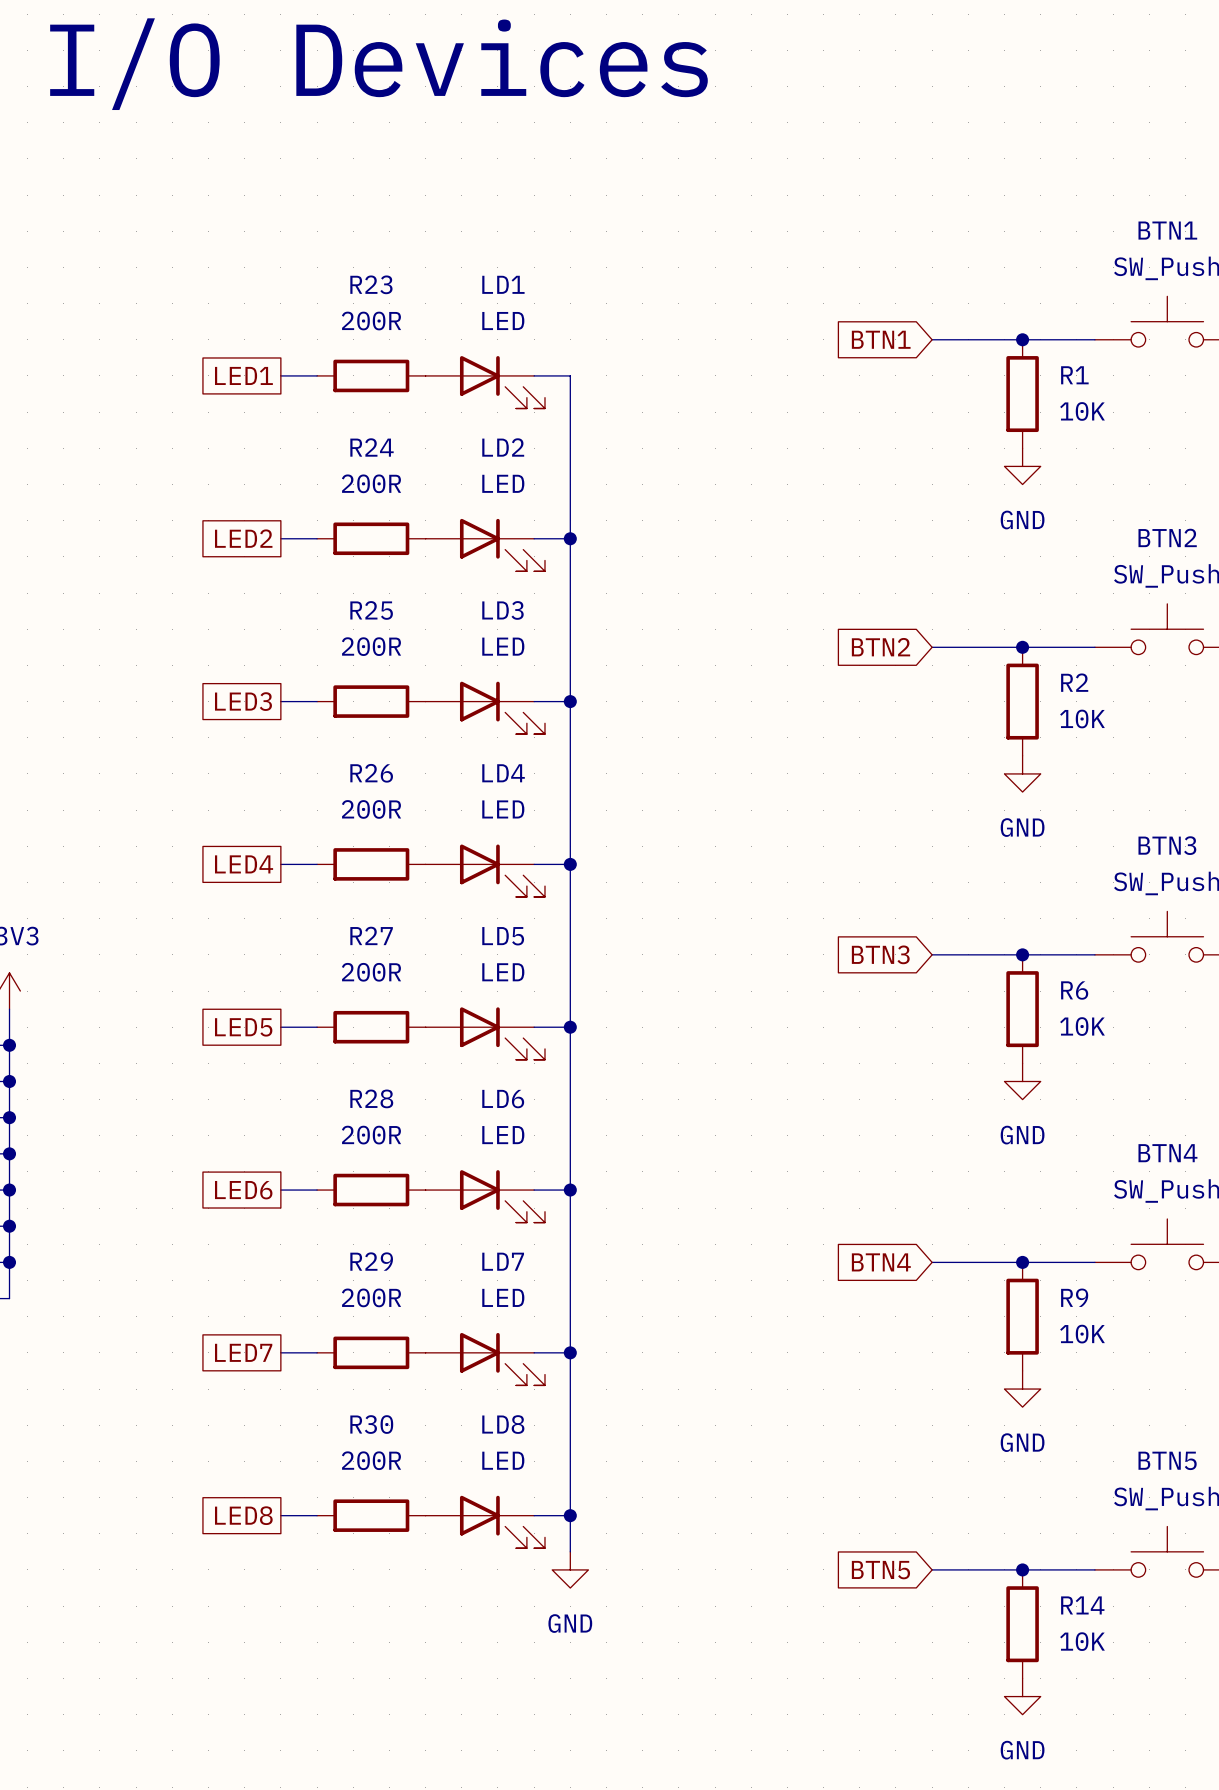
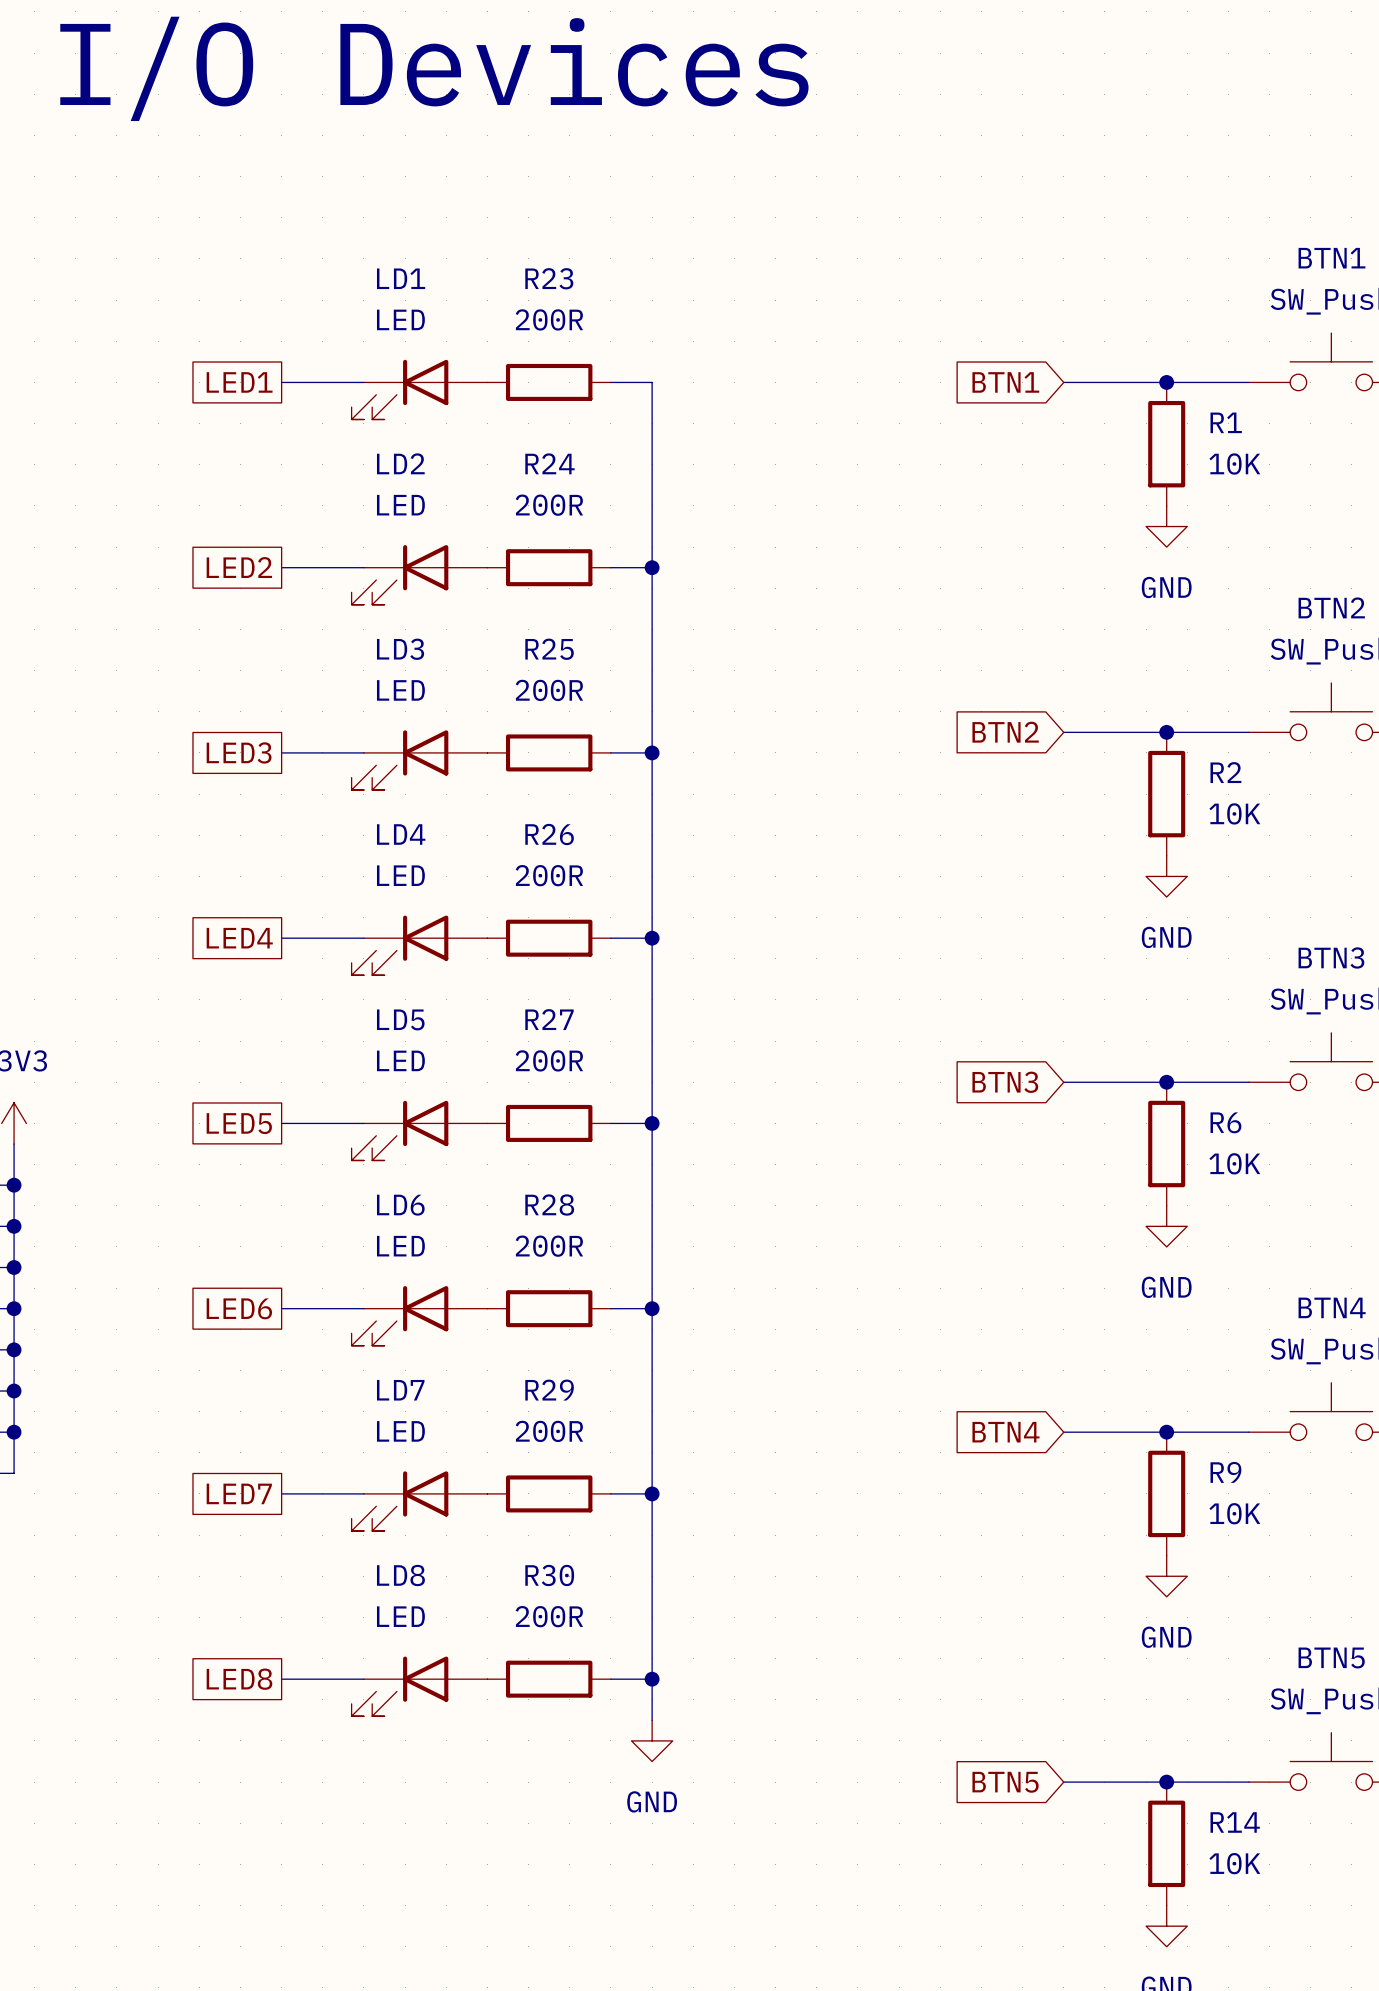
wire: none -> (281, 382) (363, 382)
global label position: LED1 (243, 375) -> LED1 (239, 382)
wire: (280, 375) (317, 375) -> none
R23 position: (371, 375) -> (549, 382)
wire: (534, 375) (570, 375) -> (610, 382) (652, 382) (652, 423)
LD1 position: (485, 382) -> (419, 389)
LD1 flip: as is (502, 382) -> left-right (399, 389)
wire: none -> (281, 567) (363, 567)
global label position: LED2 (243, 538) -> LED2 (239, 567)
wire: (280, 538) (317, 538) -> (610, 567) (652, 567)
R24 position: (371, 538) -> (549, 567)
wire: (534, 538) (570, 538) -> (610, 752) (652, 752)
junction position: (570, 538) -> (652, 567)
LD2 position: (485, 545) -> (419, 574)
LD2 flip: as is (502, 545) -> left-right (399, 574)
wire: none -> (281, 752) (363, 752)
global label position: LED3 (243, 701) -> LED3 (239, 752)
wire: (280, 701) (317, 701) -> none
R25 position: (371, 701) -> (549, 752)
wire: (534, 701) (570, 701) -> (610, 938) (652, 938)
junction position: (570, 701) -> (652, 752)
LD3 position: (485, 707) -> (419, 760)
LD3 flip: as is (502, 707) -> left-right (399, 760)
wire: none -> (281, 938) (363, 938)
global label position: LED4 (244, 864) -> LED4 (239, 938)
wire: (280, 864) (317, 864) -> none
R26 position: (371, 864) -> (549, 938)
wire: (534, 864) (570, 864) -> (610, 1123) (652, 1123)
junction position: (570, 864) -> (652, 938)
LD4 position: (485, 870) -> (419, 945)
LD4 flip: as is (502, 870) -> left-right (399, 945)
wire: none -> (281, 1123) (363, 1123)
global label position: LED5 (243, 1027) -> LED5 (239, 1123)
wire: (280, 1027) (317, 1027) -> none
R27 position: (371, 1027) -> (549, 1123)
wire: (534, 1027) (570, 1027) -> (610, 1308) (652, 1308)
junction position: (570, 1027) -> (652, 1123)
LD5 position: (485, 1033) -> (419, 1130)
LD5 flip: as is (502, 1033) -> left-right (399, 1130)
wire: none -> (281, 1308) (363, 1308)
global label position: LED6 (243, 1190) -> LED6 (239, 1308)
wire: (280, 1190) (317, 1190) -> none
R28 position: (371, 1190) -> (549, 1308)
wire: (534, 1190) (570, 1190) -> (610, 1493) (652, 1493)
junction position: (570, 1190) -> (652, 1308)
LD6 position: (485, 1196) -> (419, 1315)
LD6 flip: as is (502, 1196) -> left-right (399, 1315)
wire: none -> (281, 1493) (363, 1493)
global label position: LED7 (243, 1352) -> LED7 (239, 1493)
wire: (280, 1352) (317, 1352) -> none
R29 position: (371, 1352) -> (549, 1493)
wire: (534, 1352) (570, 1352) -> (610, 1679) (652, 1679)
junction position: (570, 1352) -> (652, 1493)
LD7 position: (485, 1359) -> (419, 1501)
LD7 flip: as is (502, 1359) -> left-right (399, 1501)
wire: none -> (281, 1679) (363, 1679)
global label position: LED8 (243, 1515) -> LED8 (239, 1679)
wire: (280, 1515) (317, 1515) -> none
R30 position: (371, 1515) -> (549, 1679)
wire: (534, 1515) (570, 1515) (570, 1551) -> none
junction position: (570, 1515) -> (652, 1679)
LD8 position: (485, 1522) -> (419, 1686)
LD8 flip: as is (502, 1522) -> left-right (399, 1686)
power symbol position: GND (570, 1569) -> GND (652, 1740)

